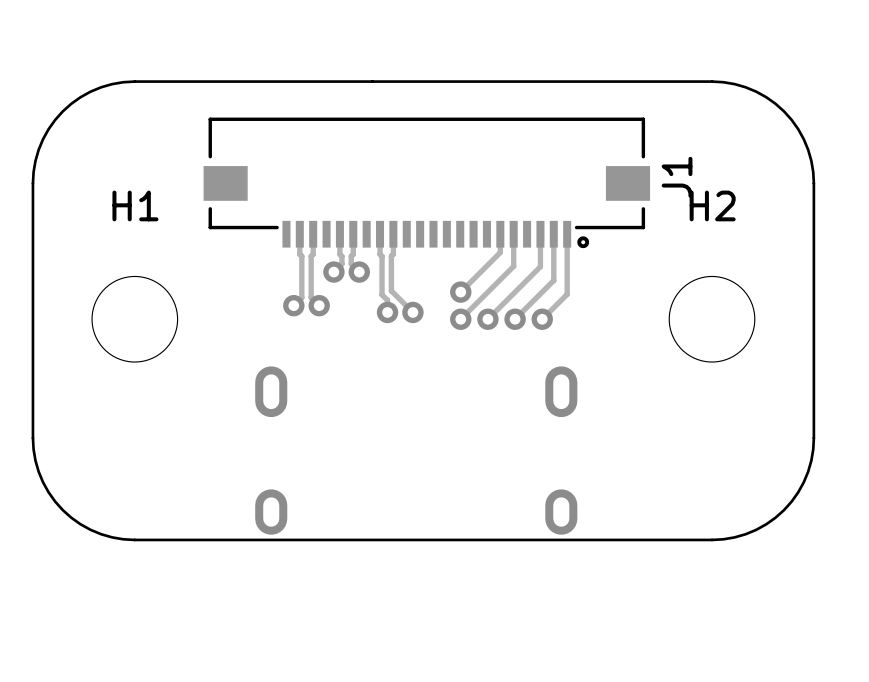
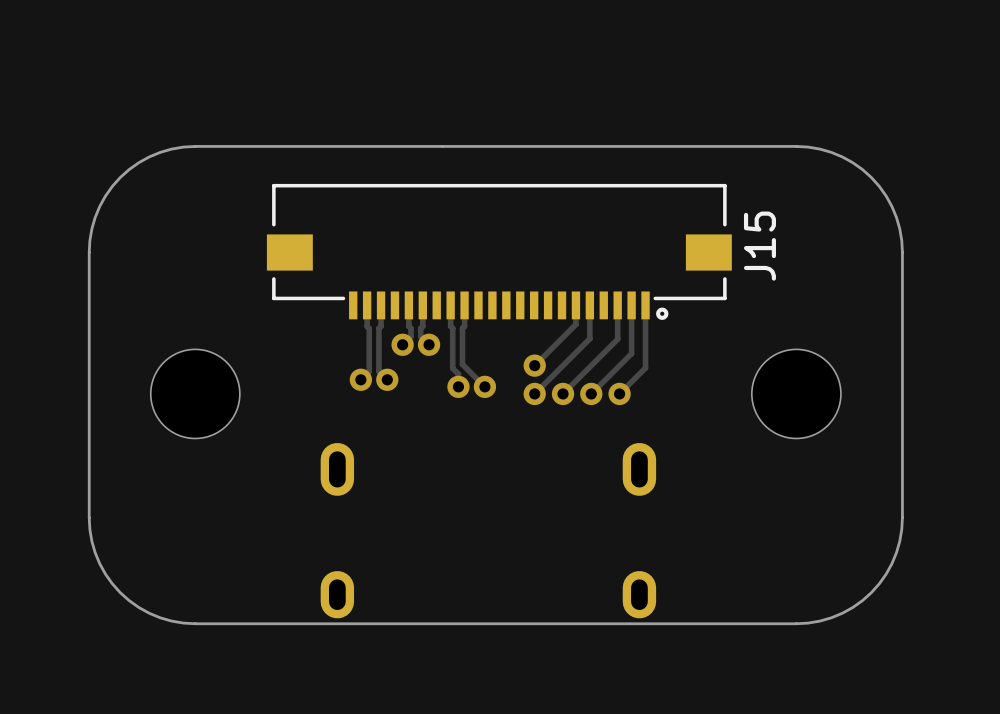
J1 name: J1 (677, 177) -> J15 (759, 246)
H1 name: H1 (135, 205) -> none
H2 name: H2 (712, 205) -> none

